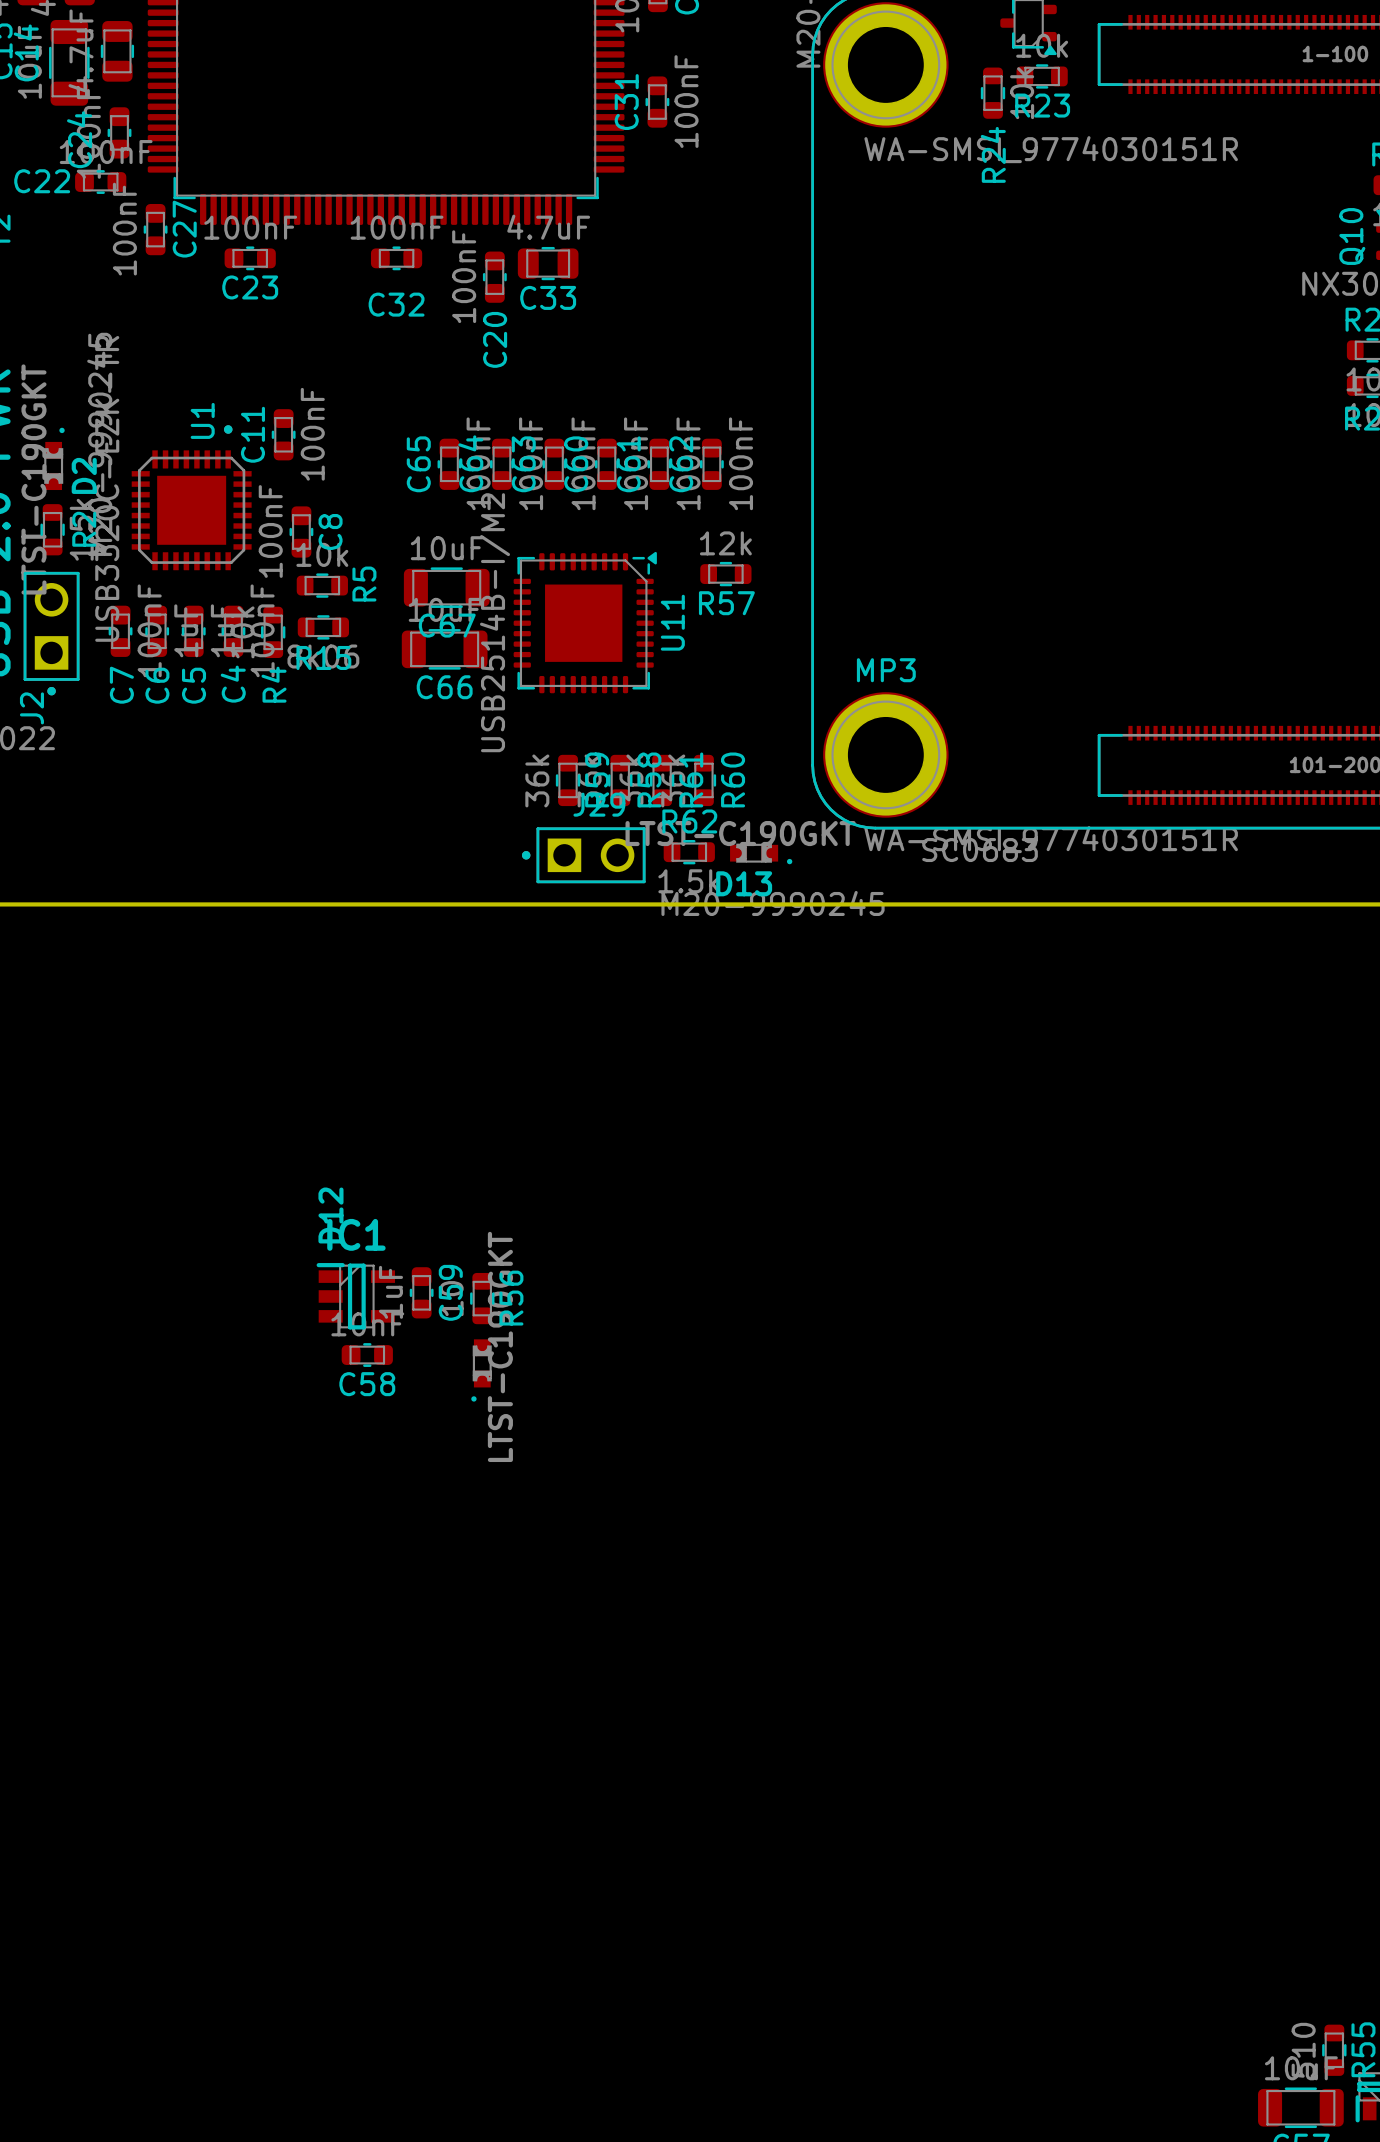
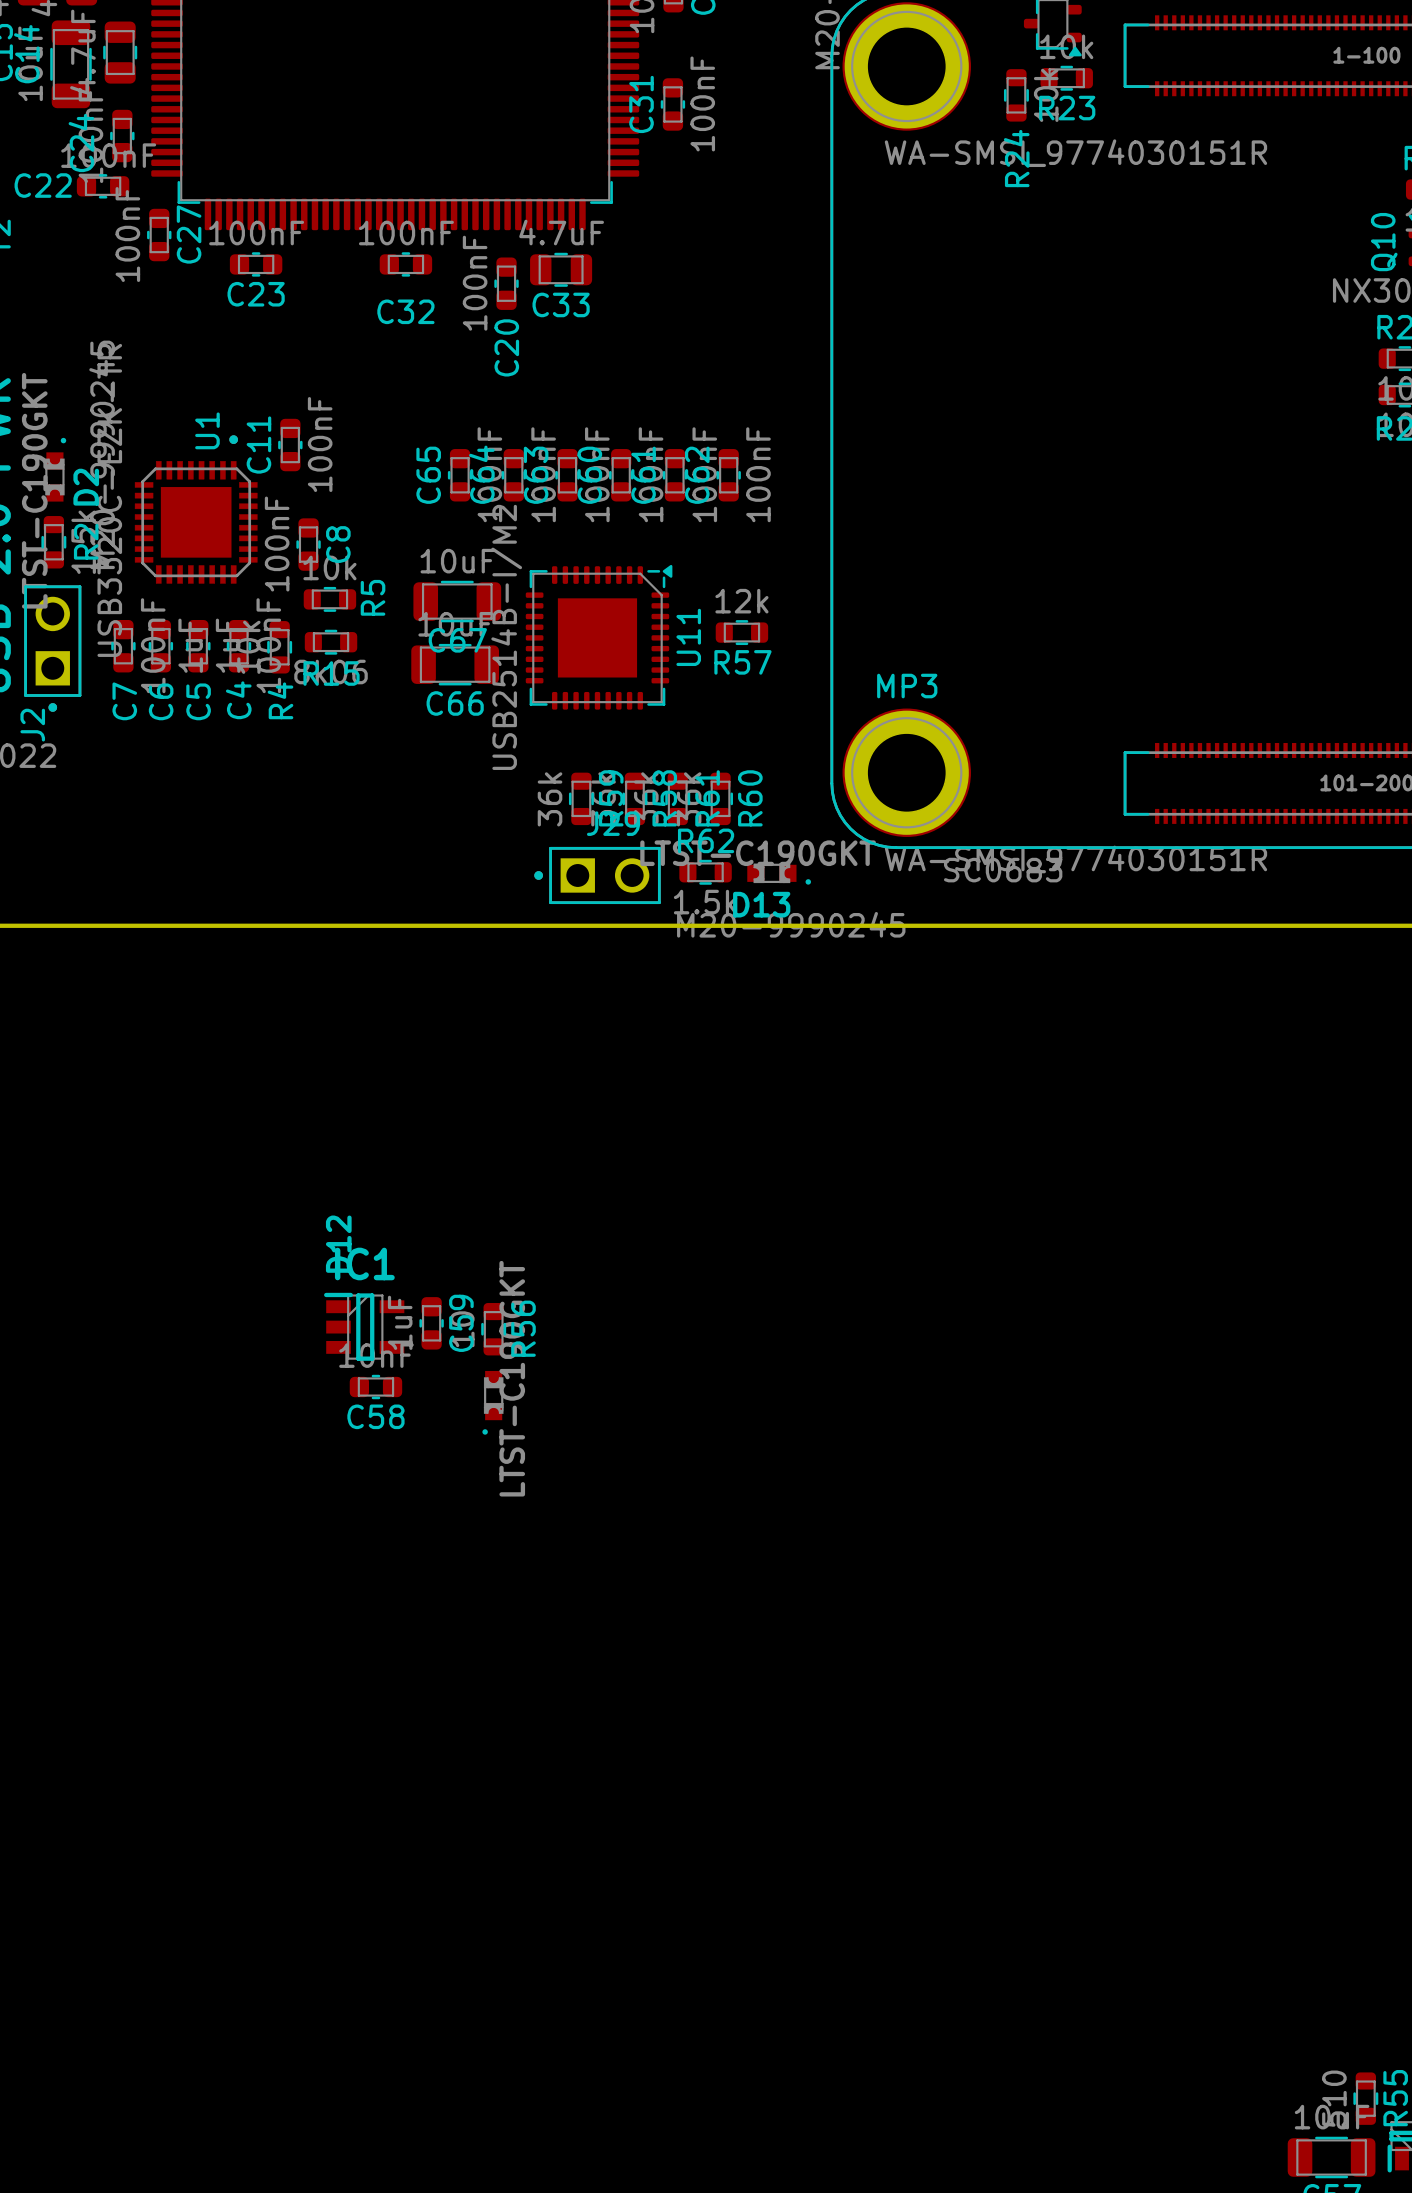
R57 position: (725, 574) -> (741, 632)

